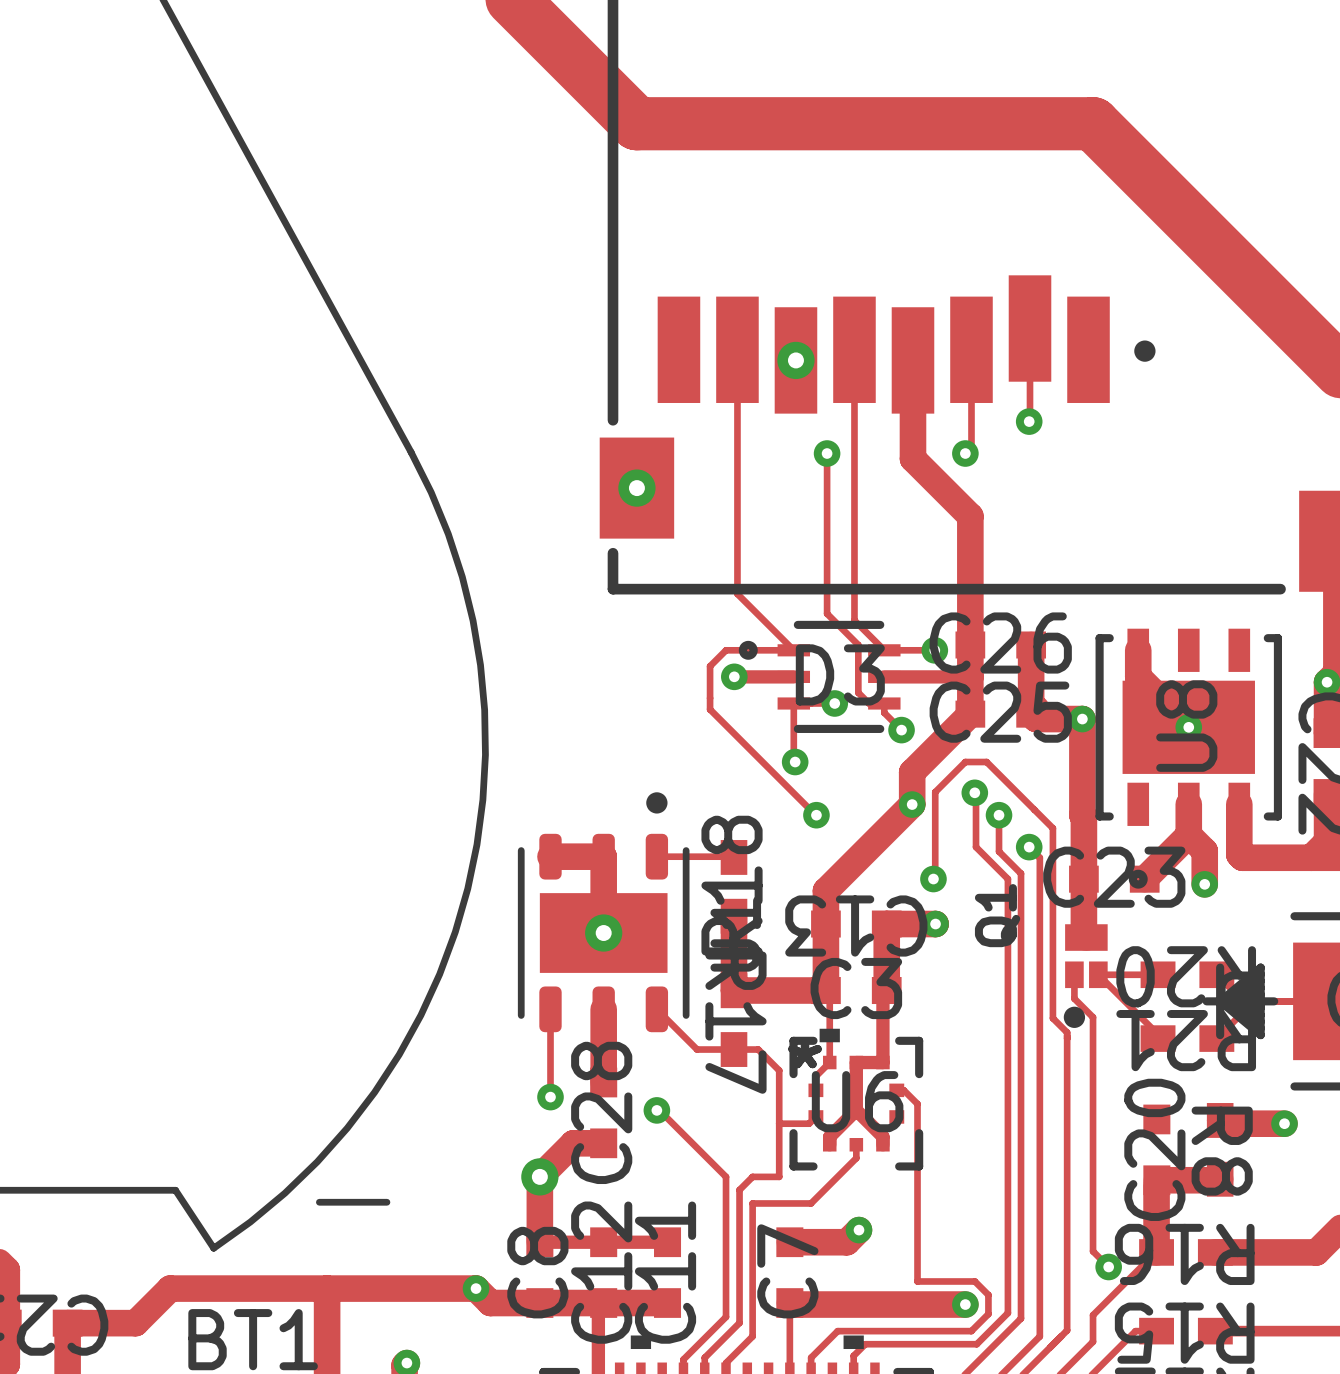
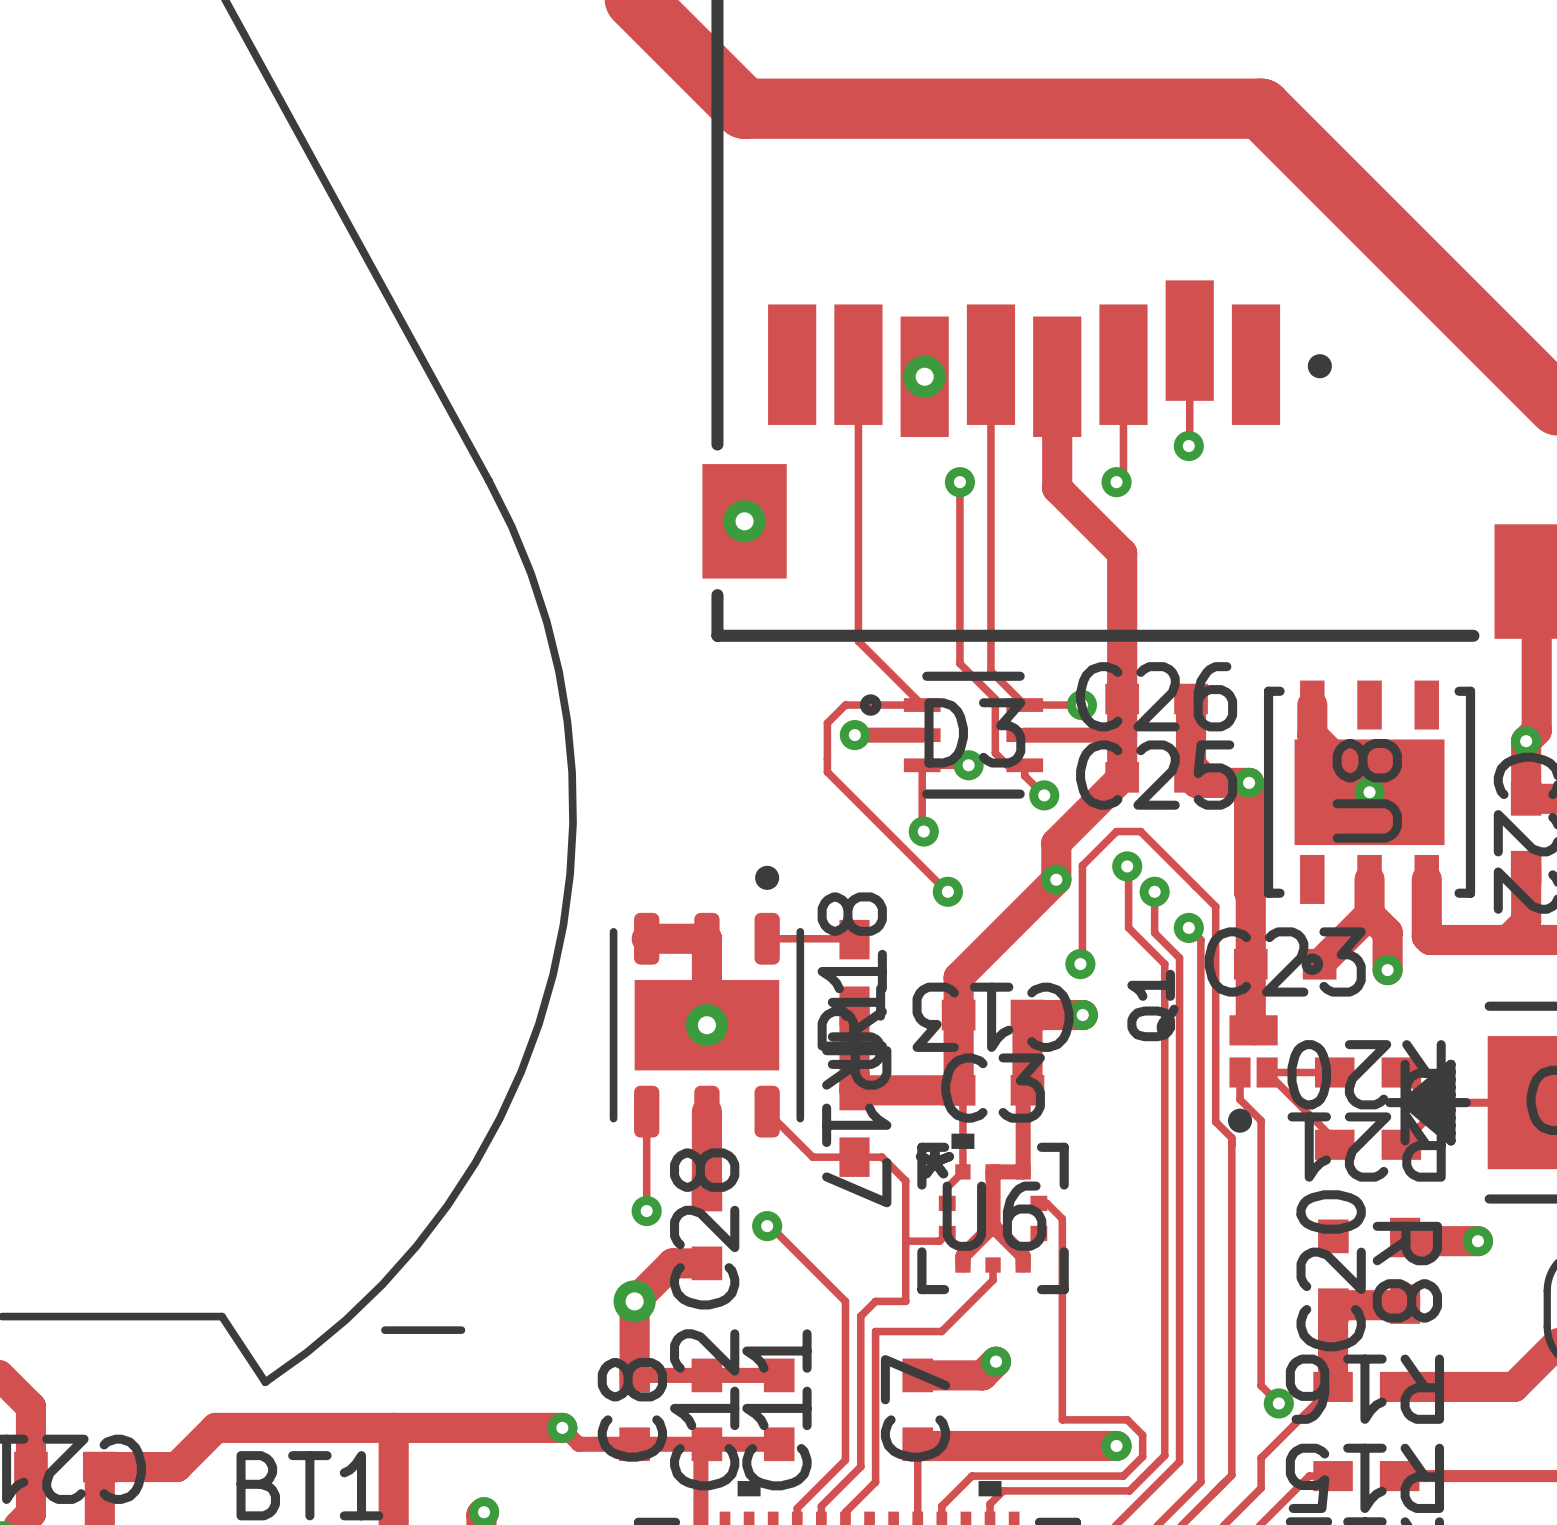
track width: thick (476, 1288) (490, 1303) (667, 1303) -> thin (562, 1427) (578, 1444) (779, 1444)

